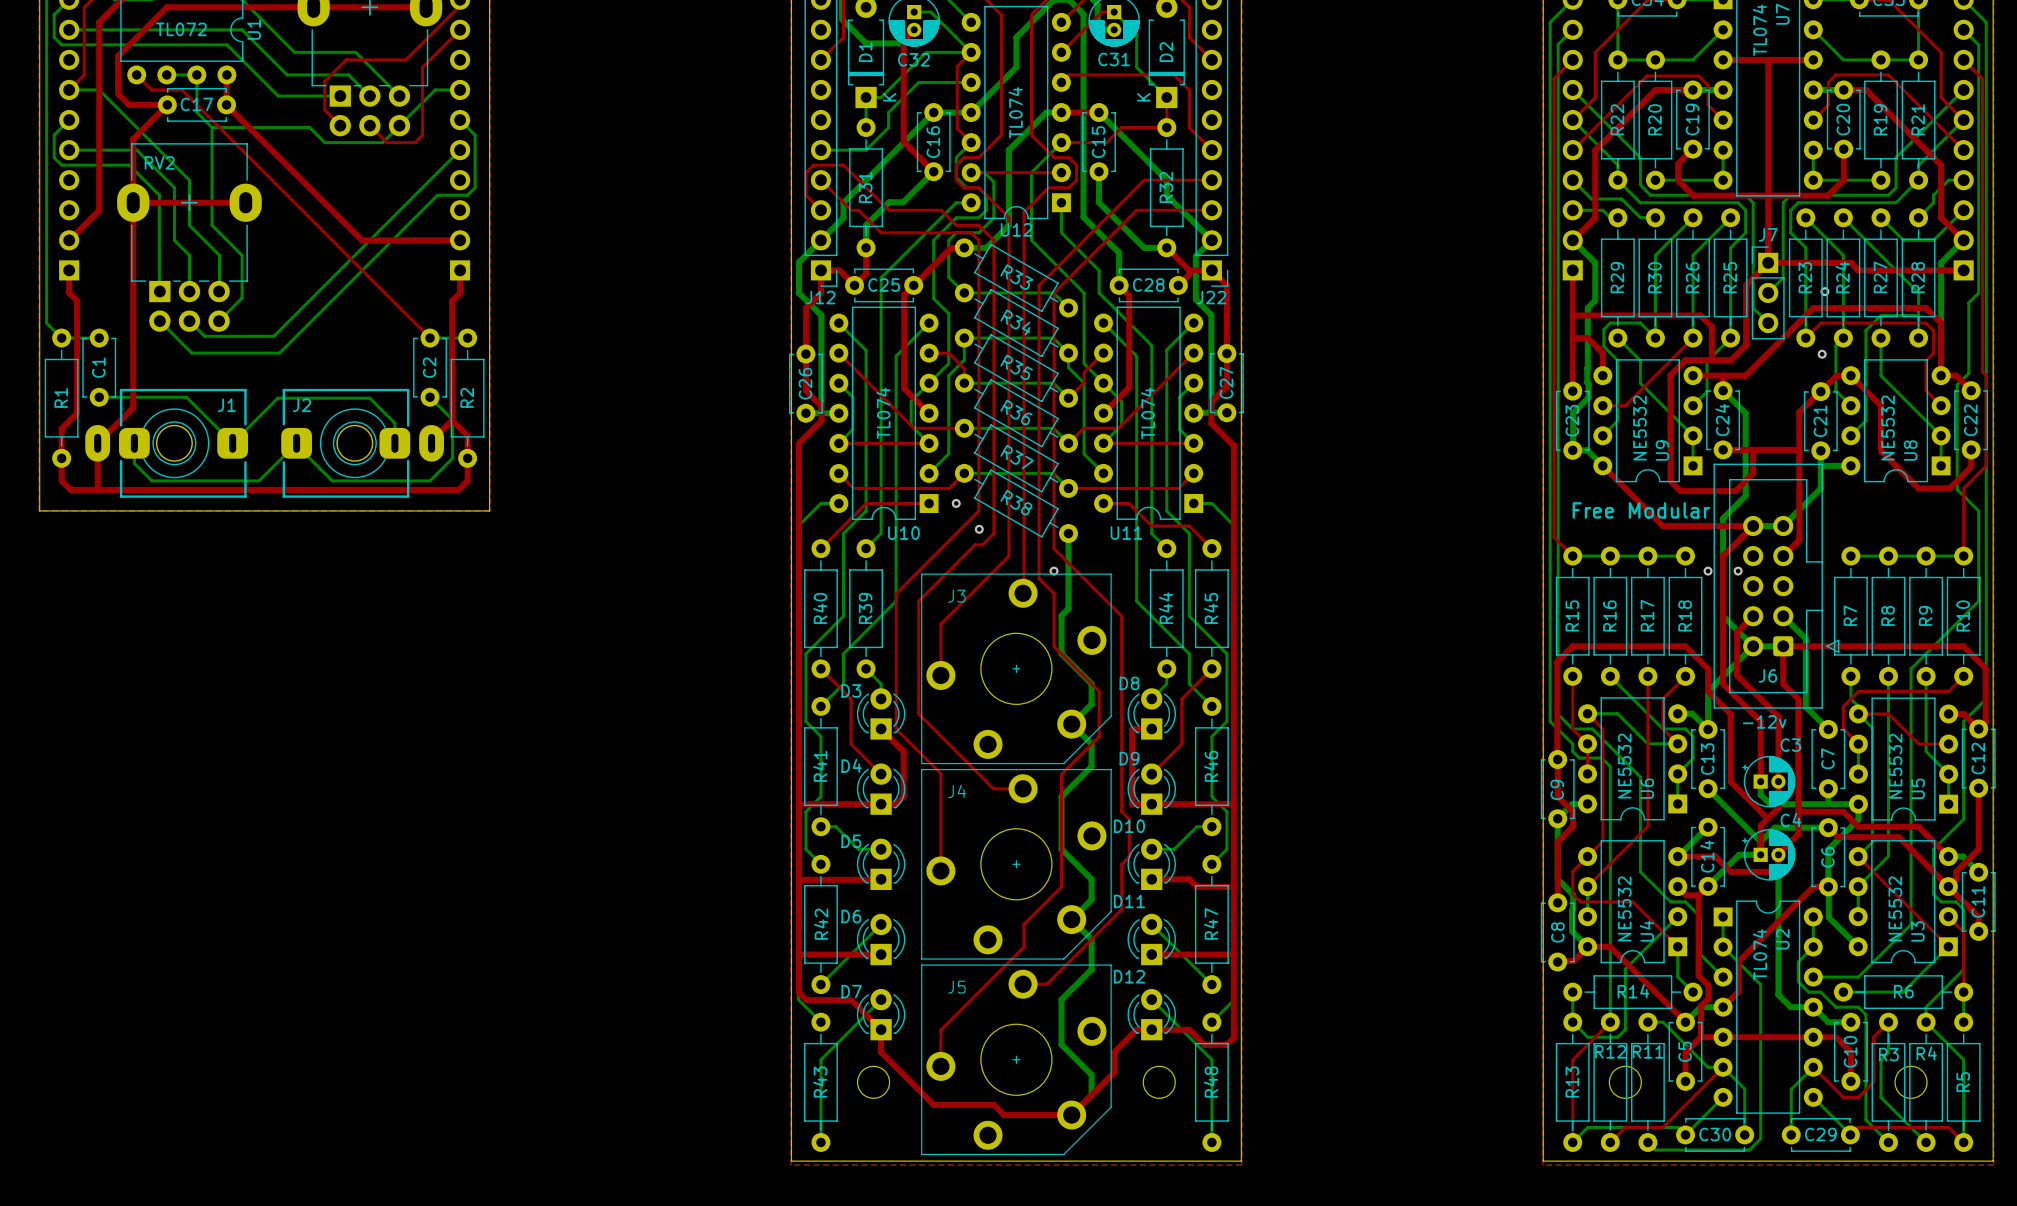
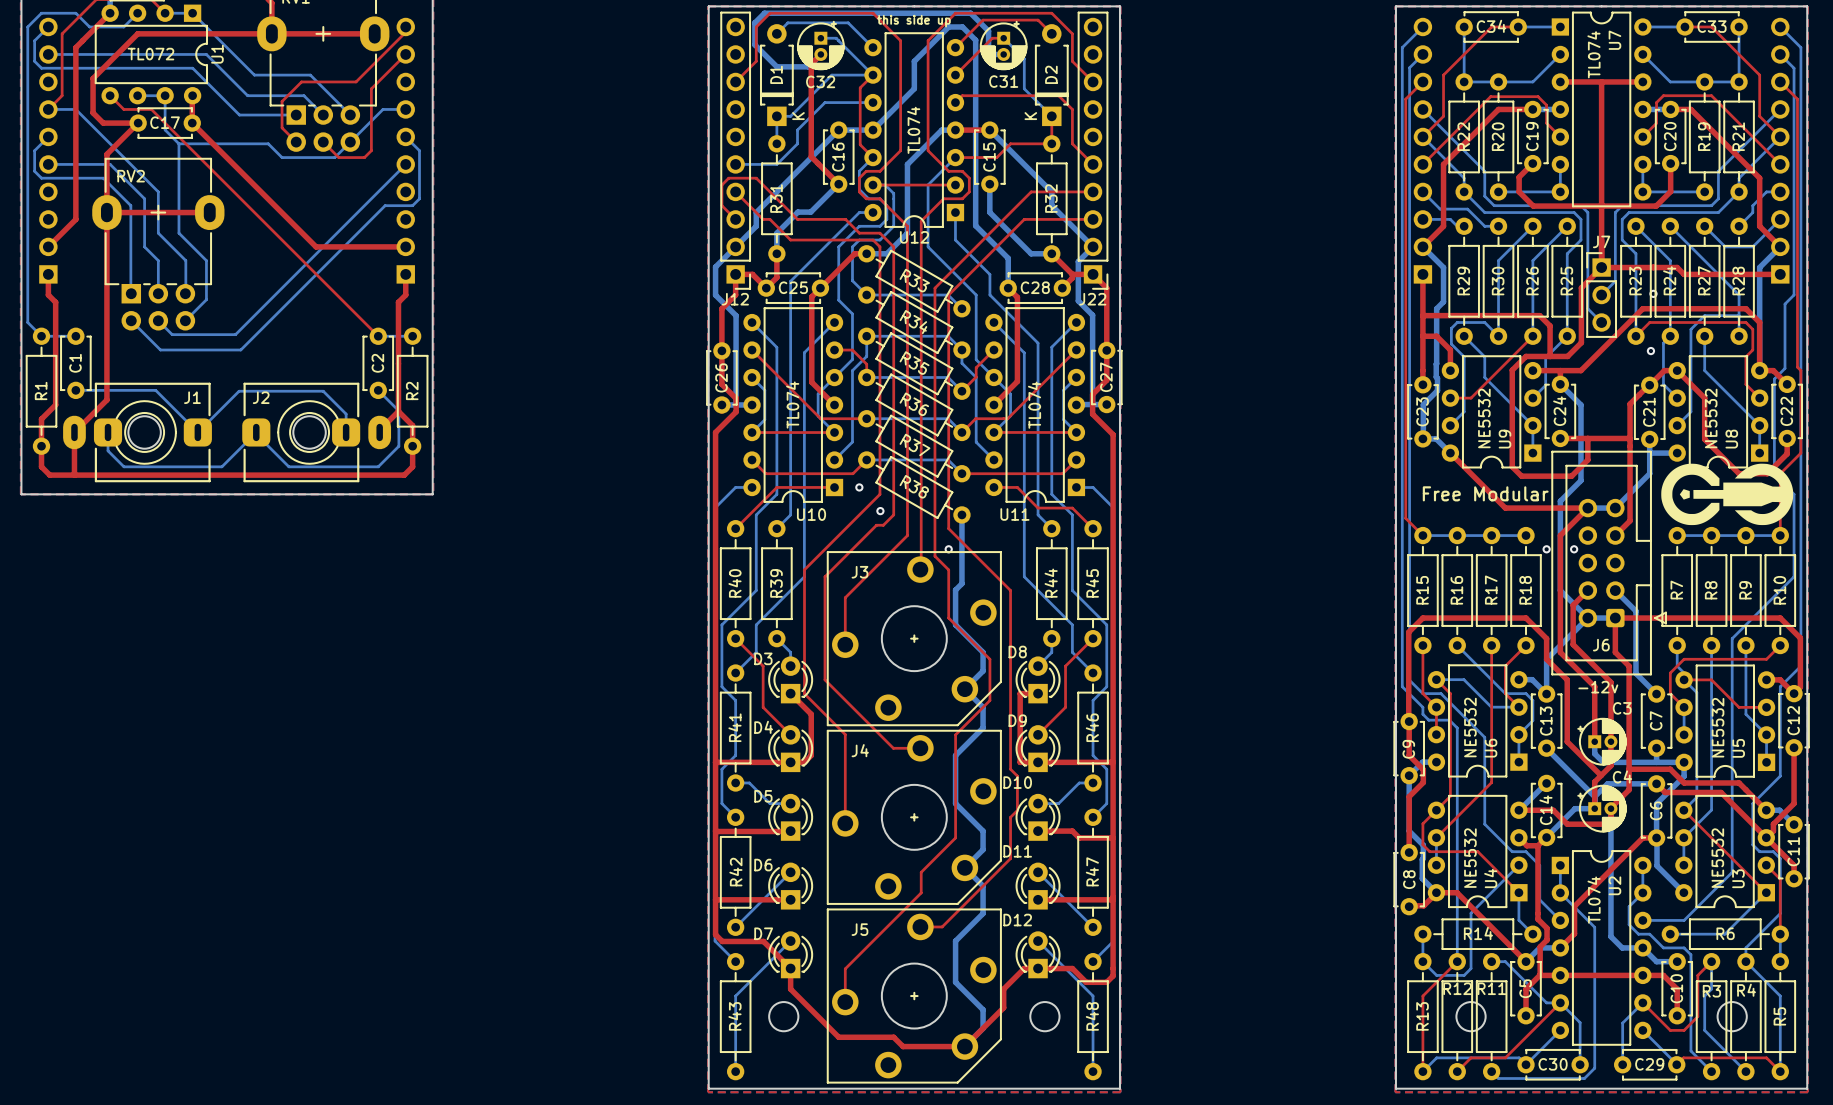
drawing: none -> [1661, 463, 1794, 526]

